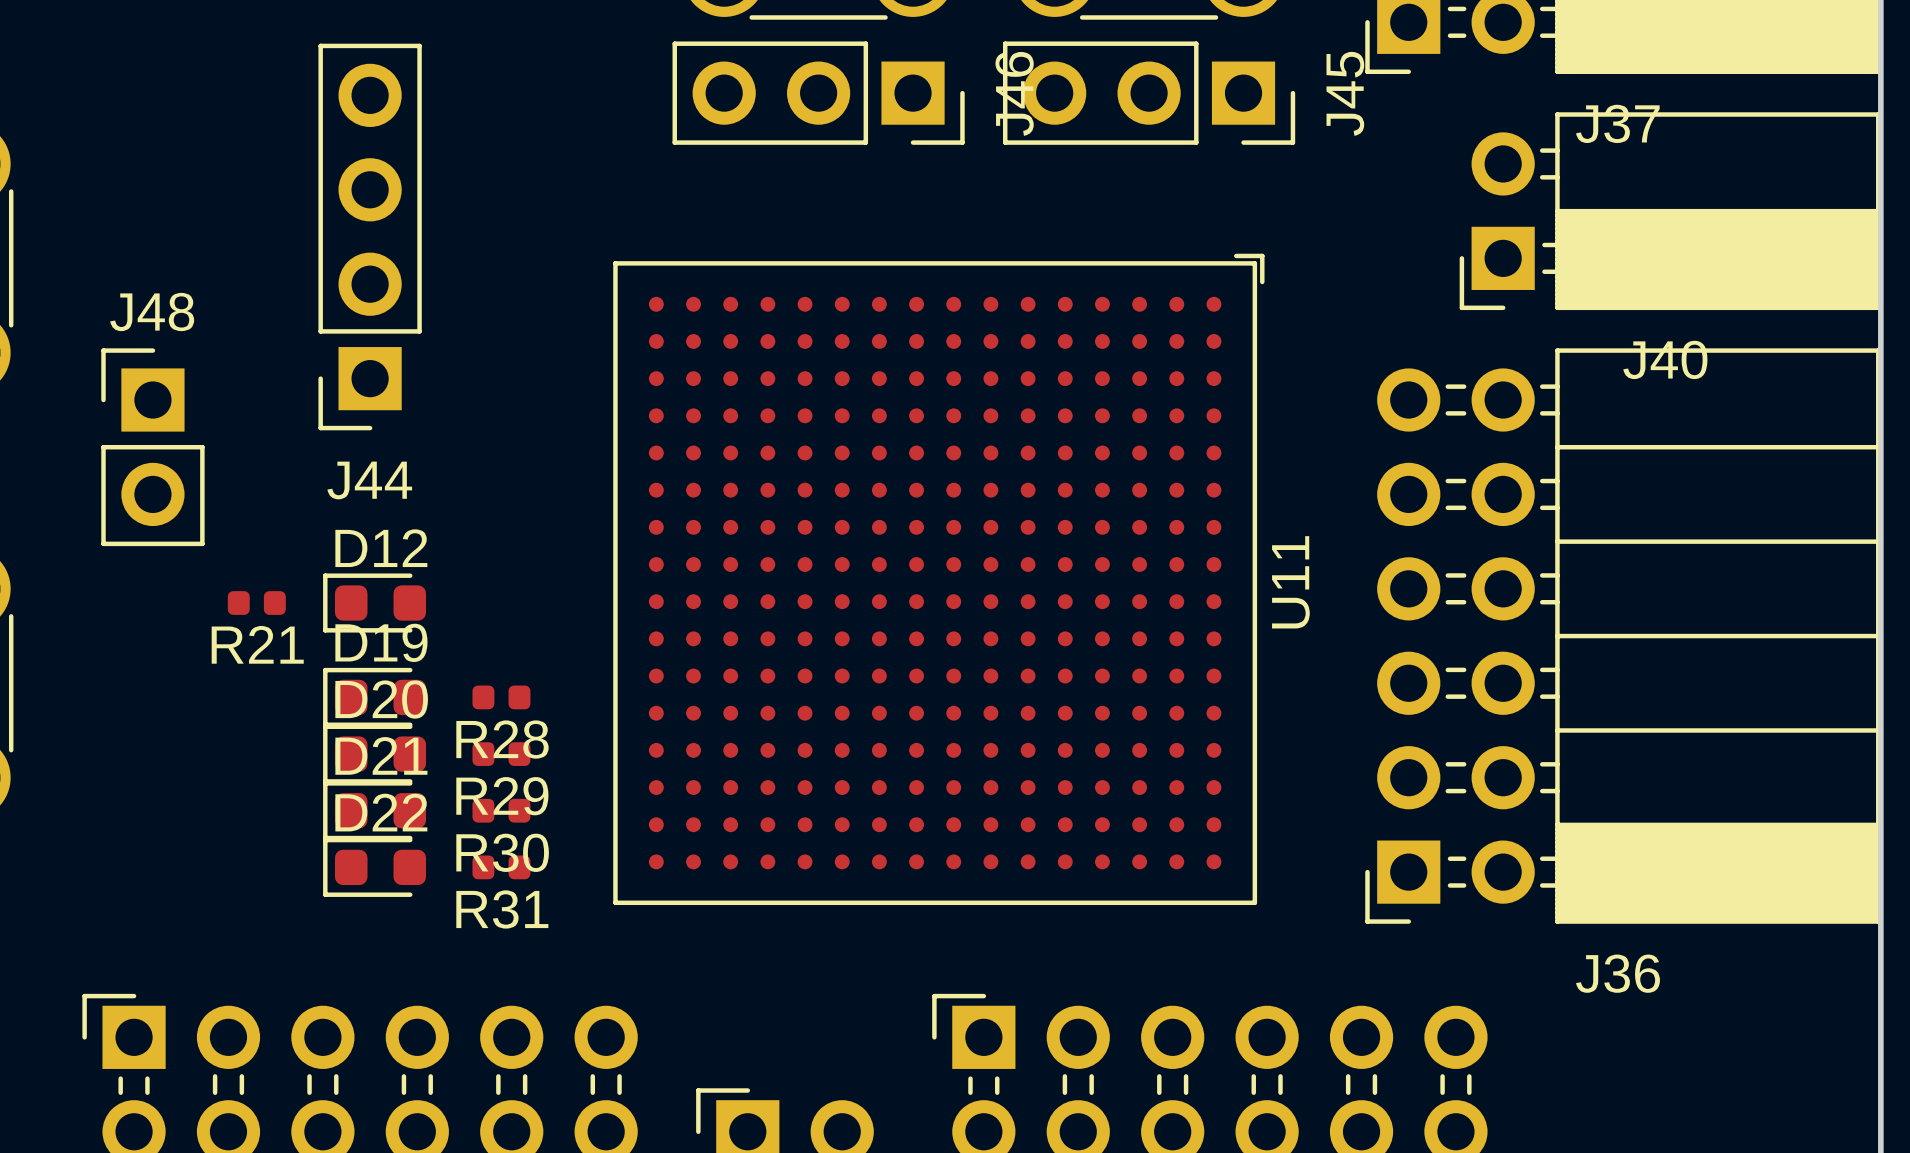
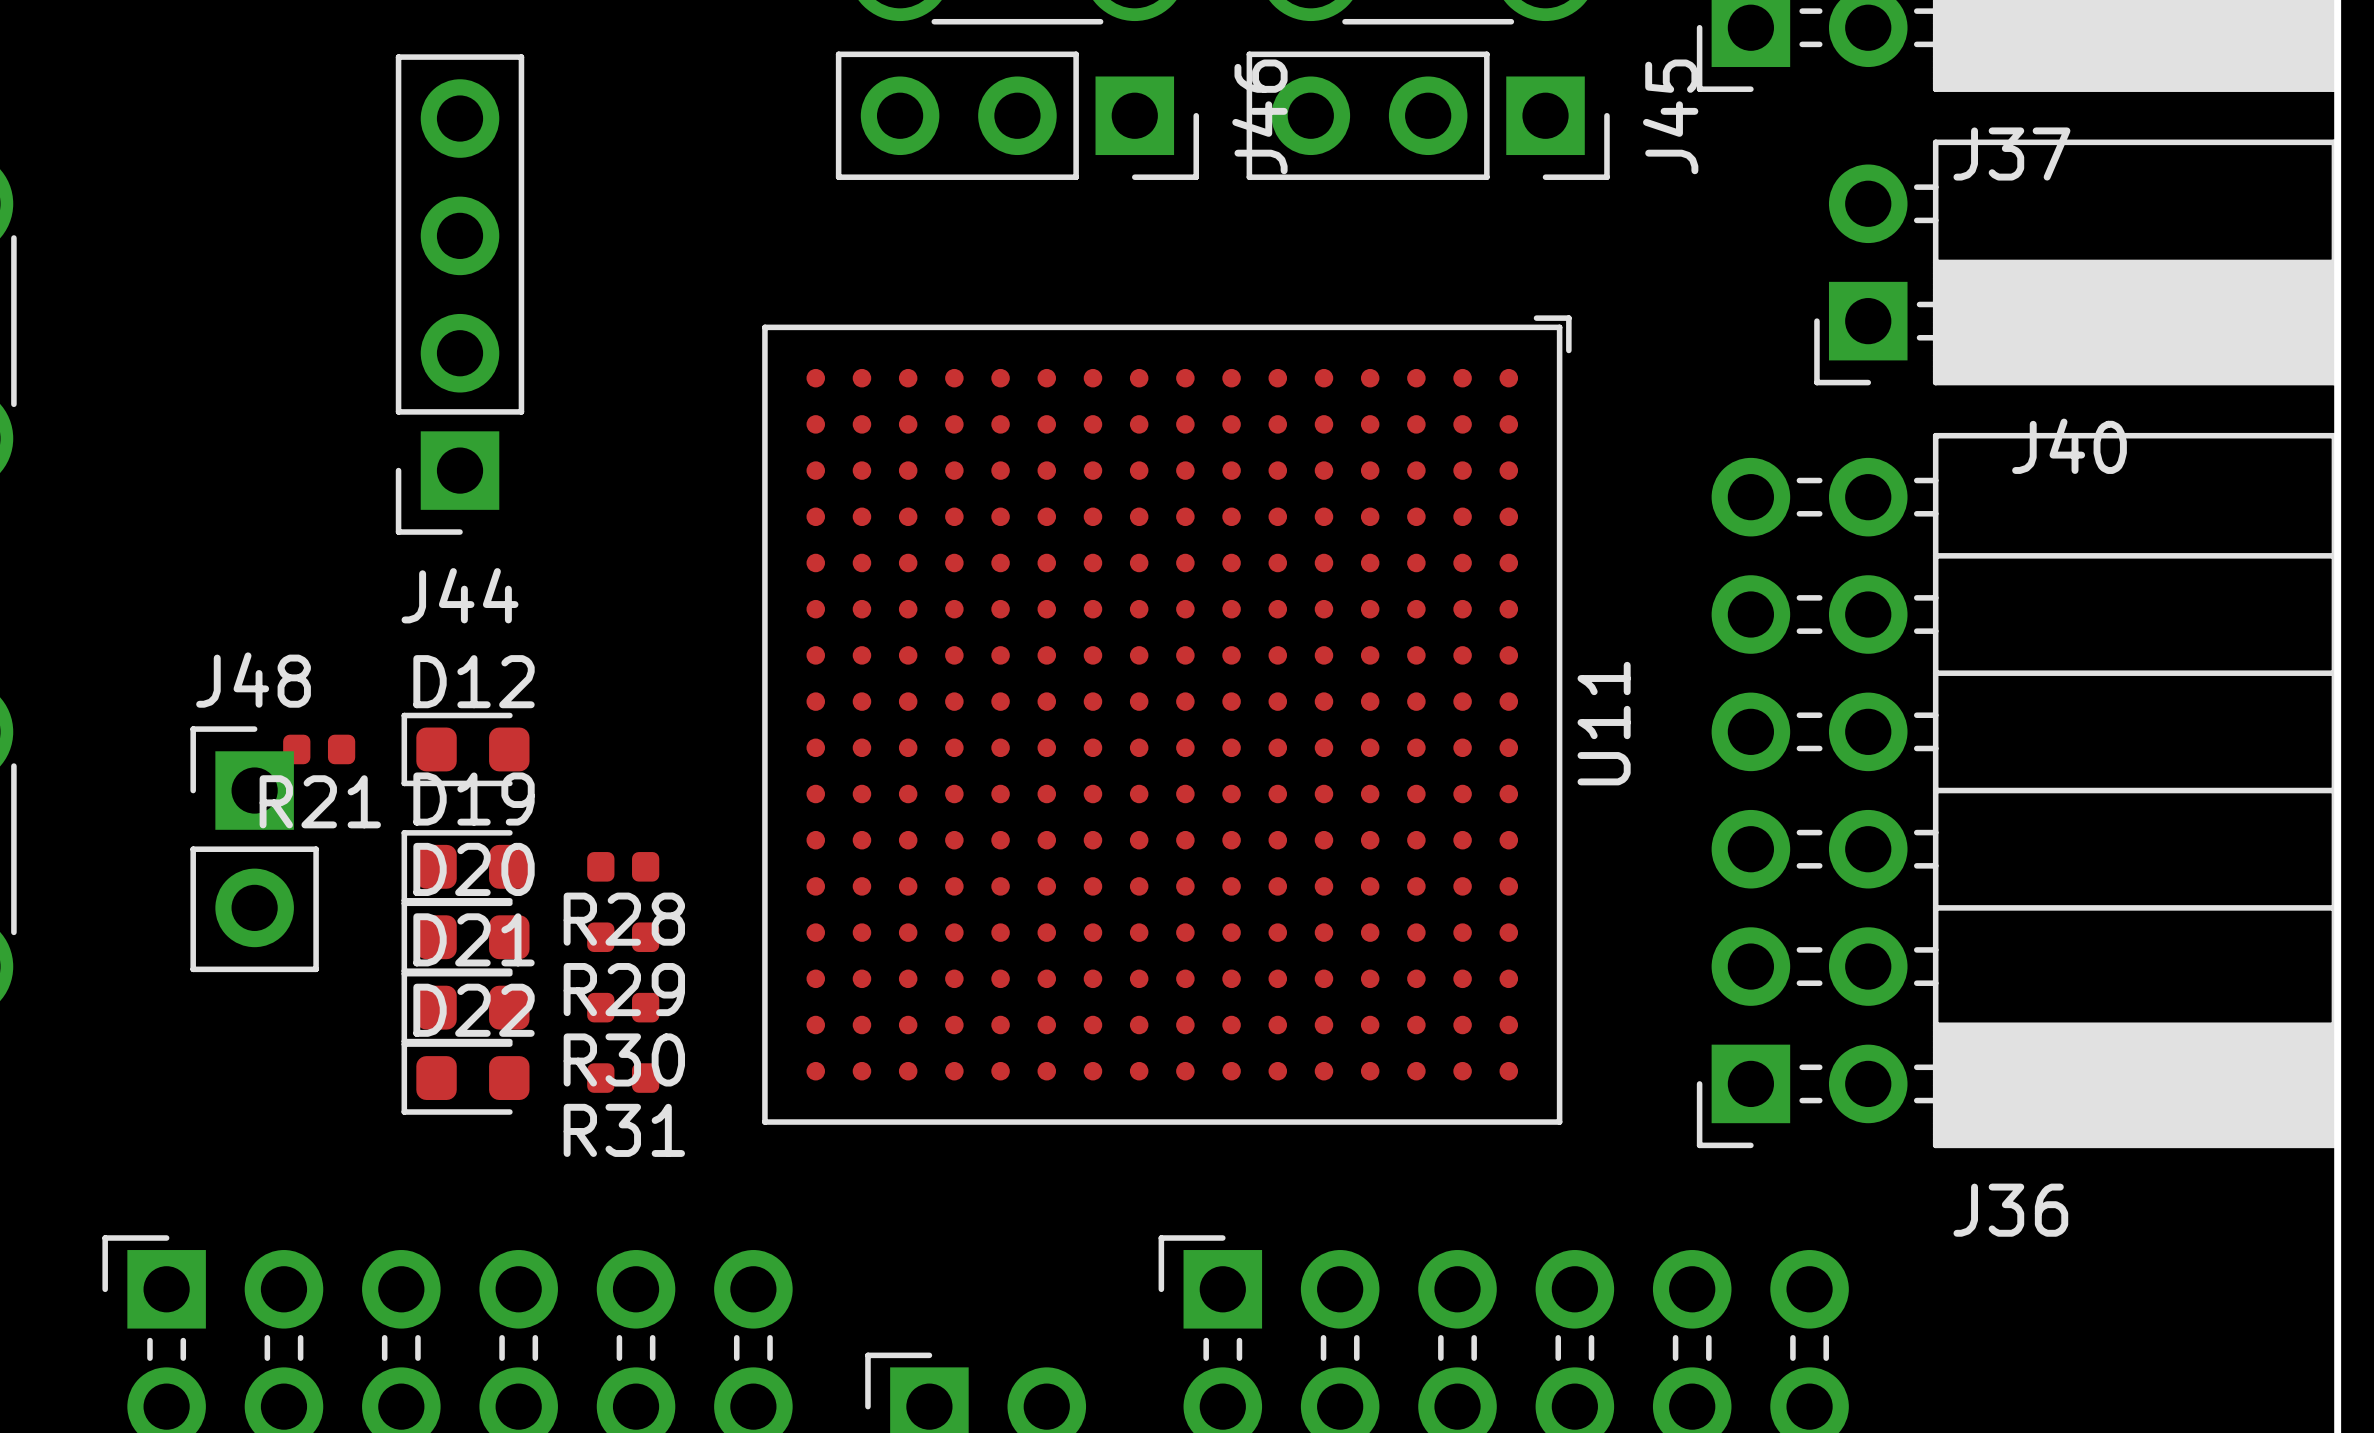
J48 position: (152, 447) -> (254, 849)

